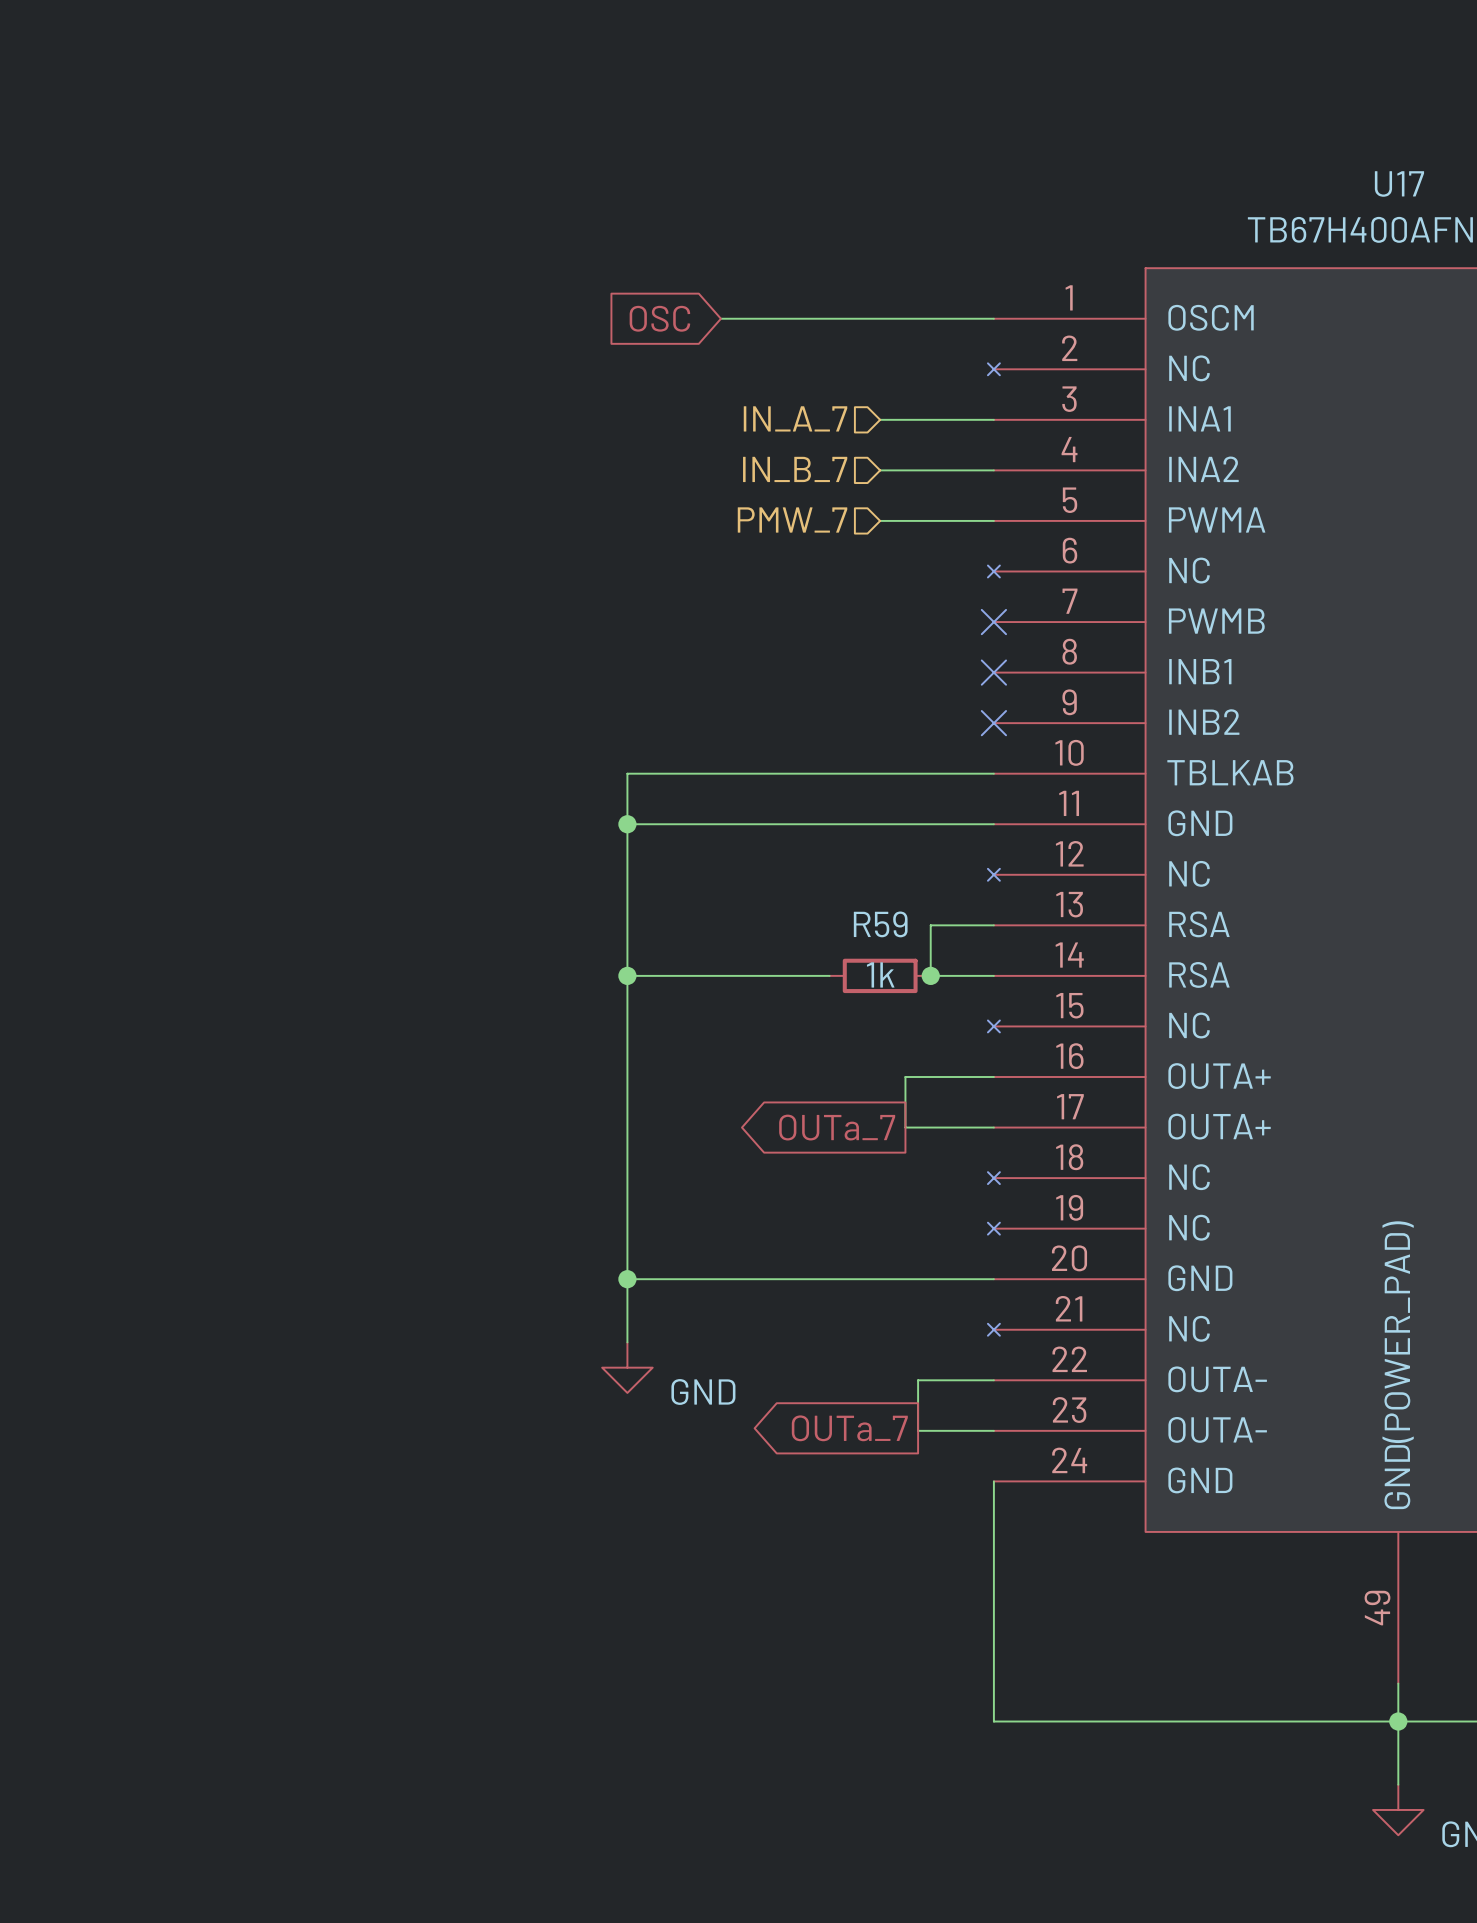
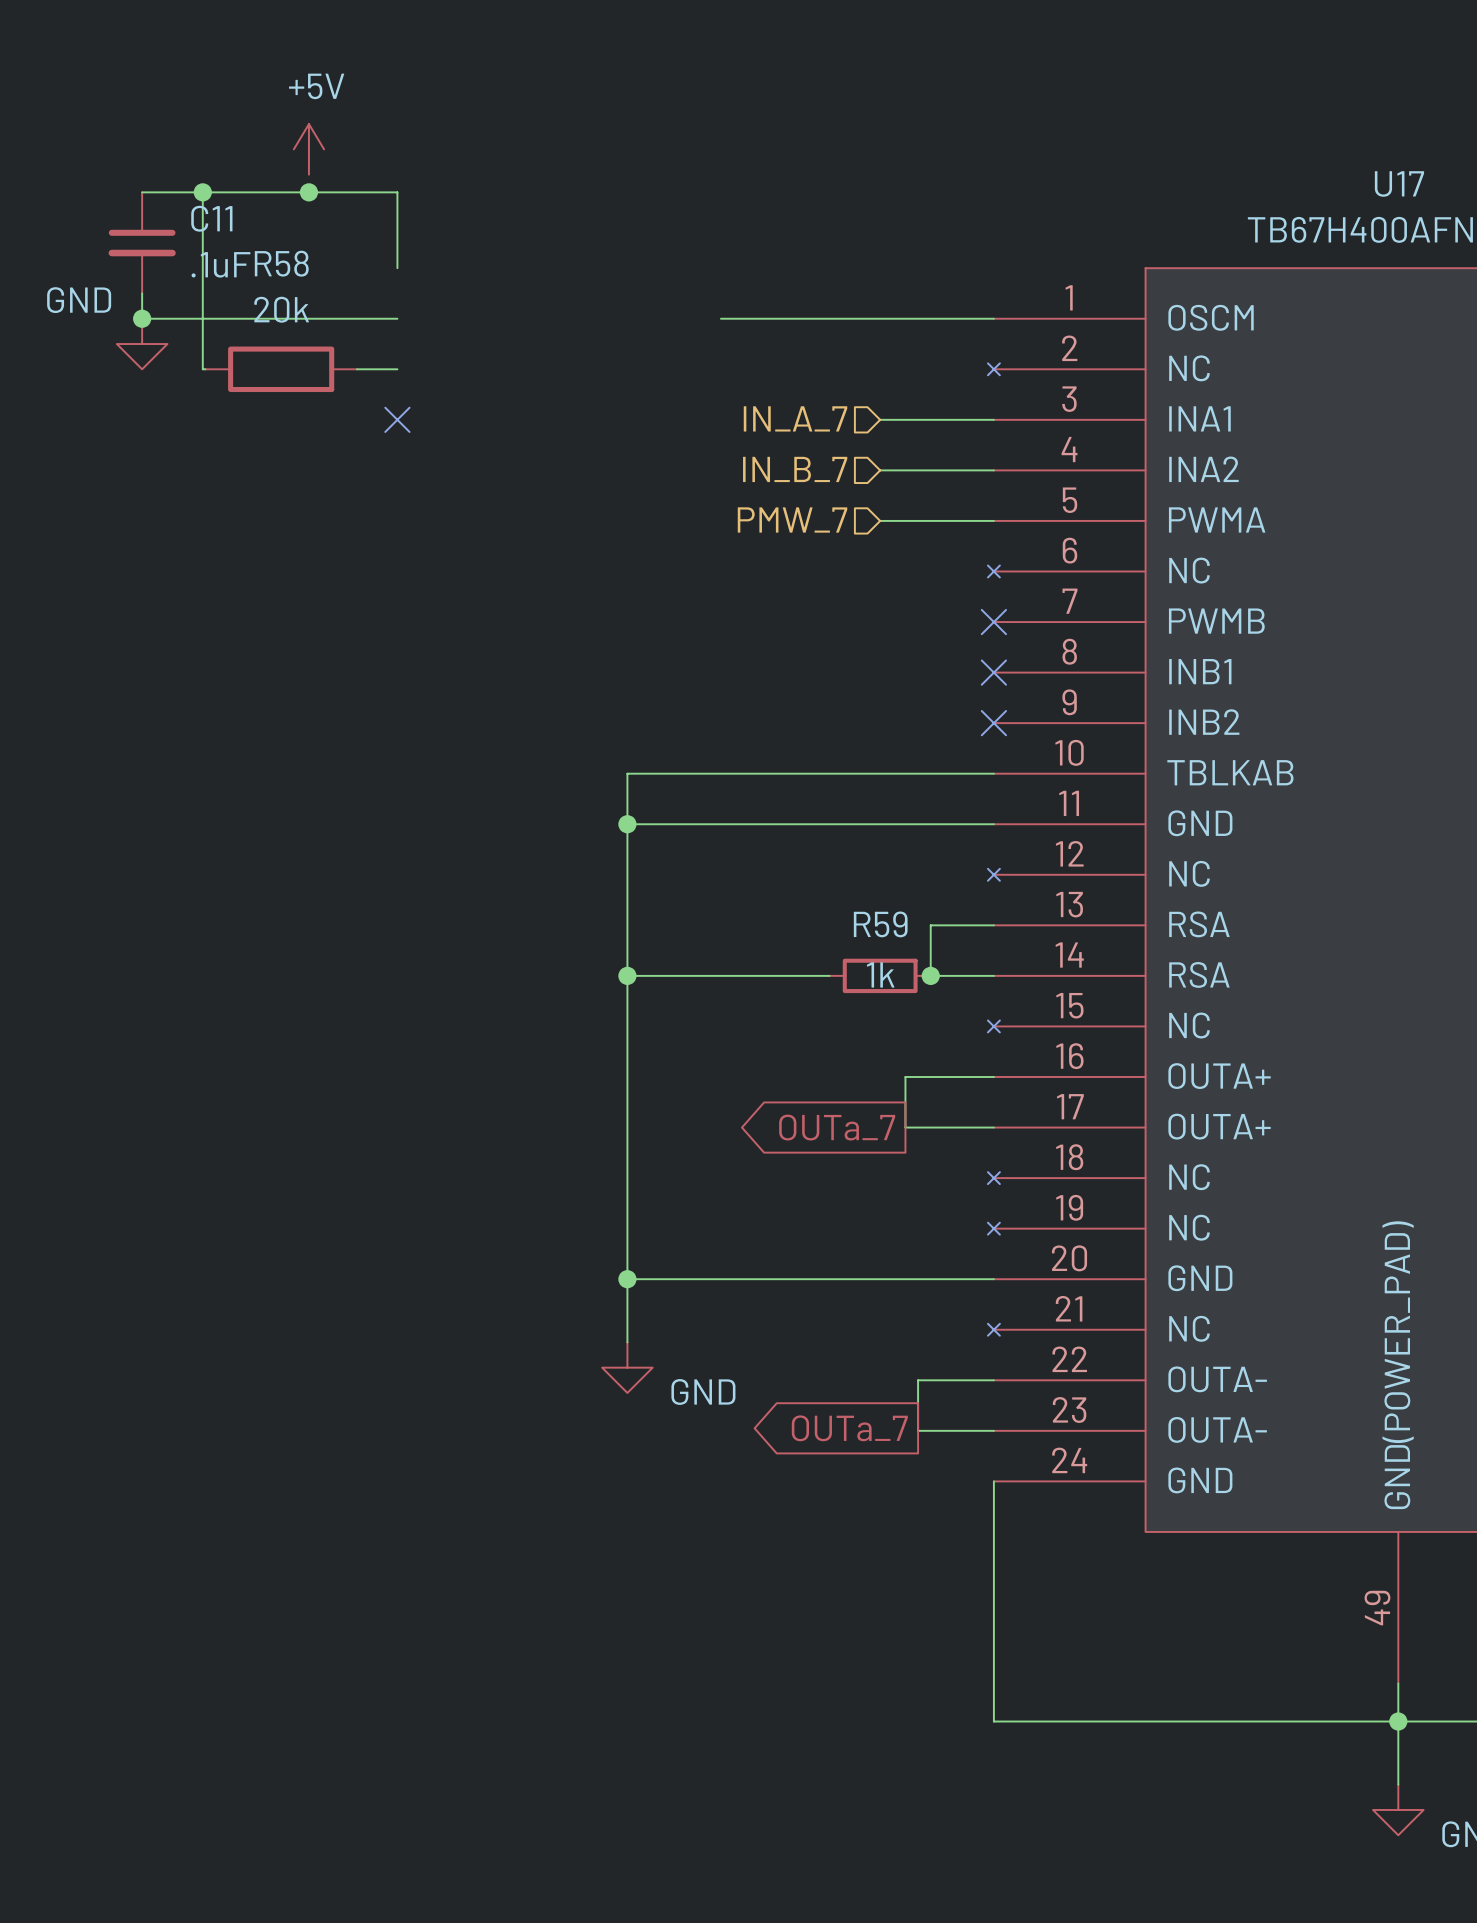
power symbol: none -> +5V (308, 149)
wire: none -> (142, 192) (397, 192) (397, 268)
wire: none -> (202, 192) (202, 369) (205, 369)
junction: none -> (202, 192)
junction: none -> (308, 192)
C11: none -> .1uF (142, 242)
wire: none -> (142, 293) (142, 318) (397, 318)
junction: none -> (142, 318)
global label: OSC (659, 318) -> none
power symbol: none -> GND (142, 344)
R58: none -> 20k (281, 369)
wire: none -> (356, 369) (397, 369)
no-connect mark: none -> (397, 419)

